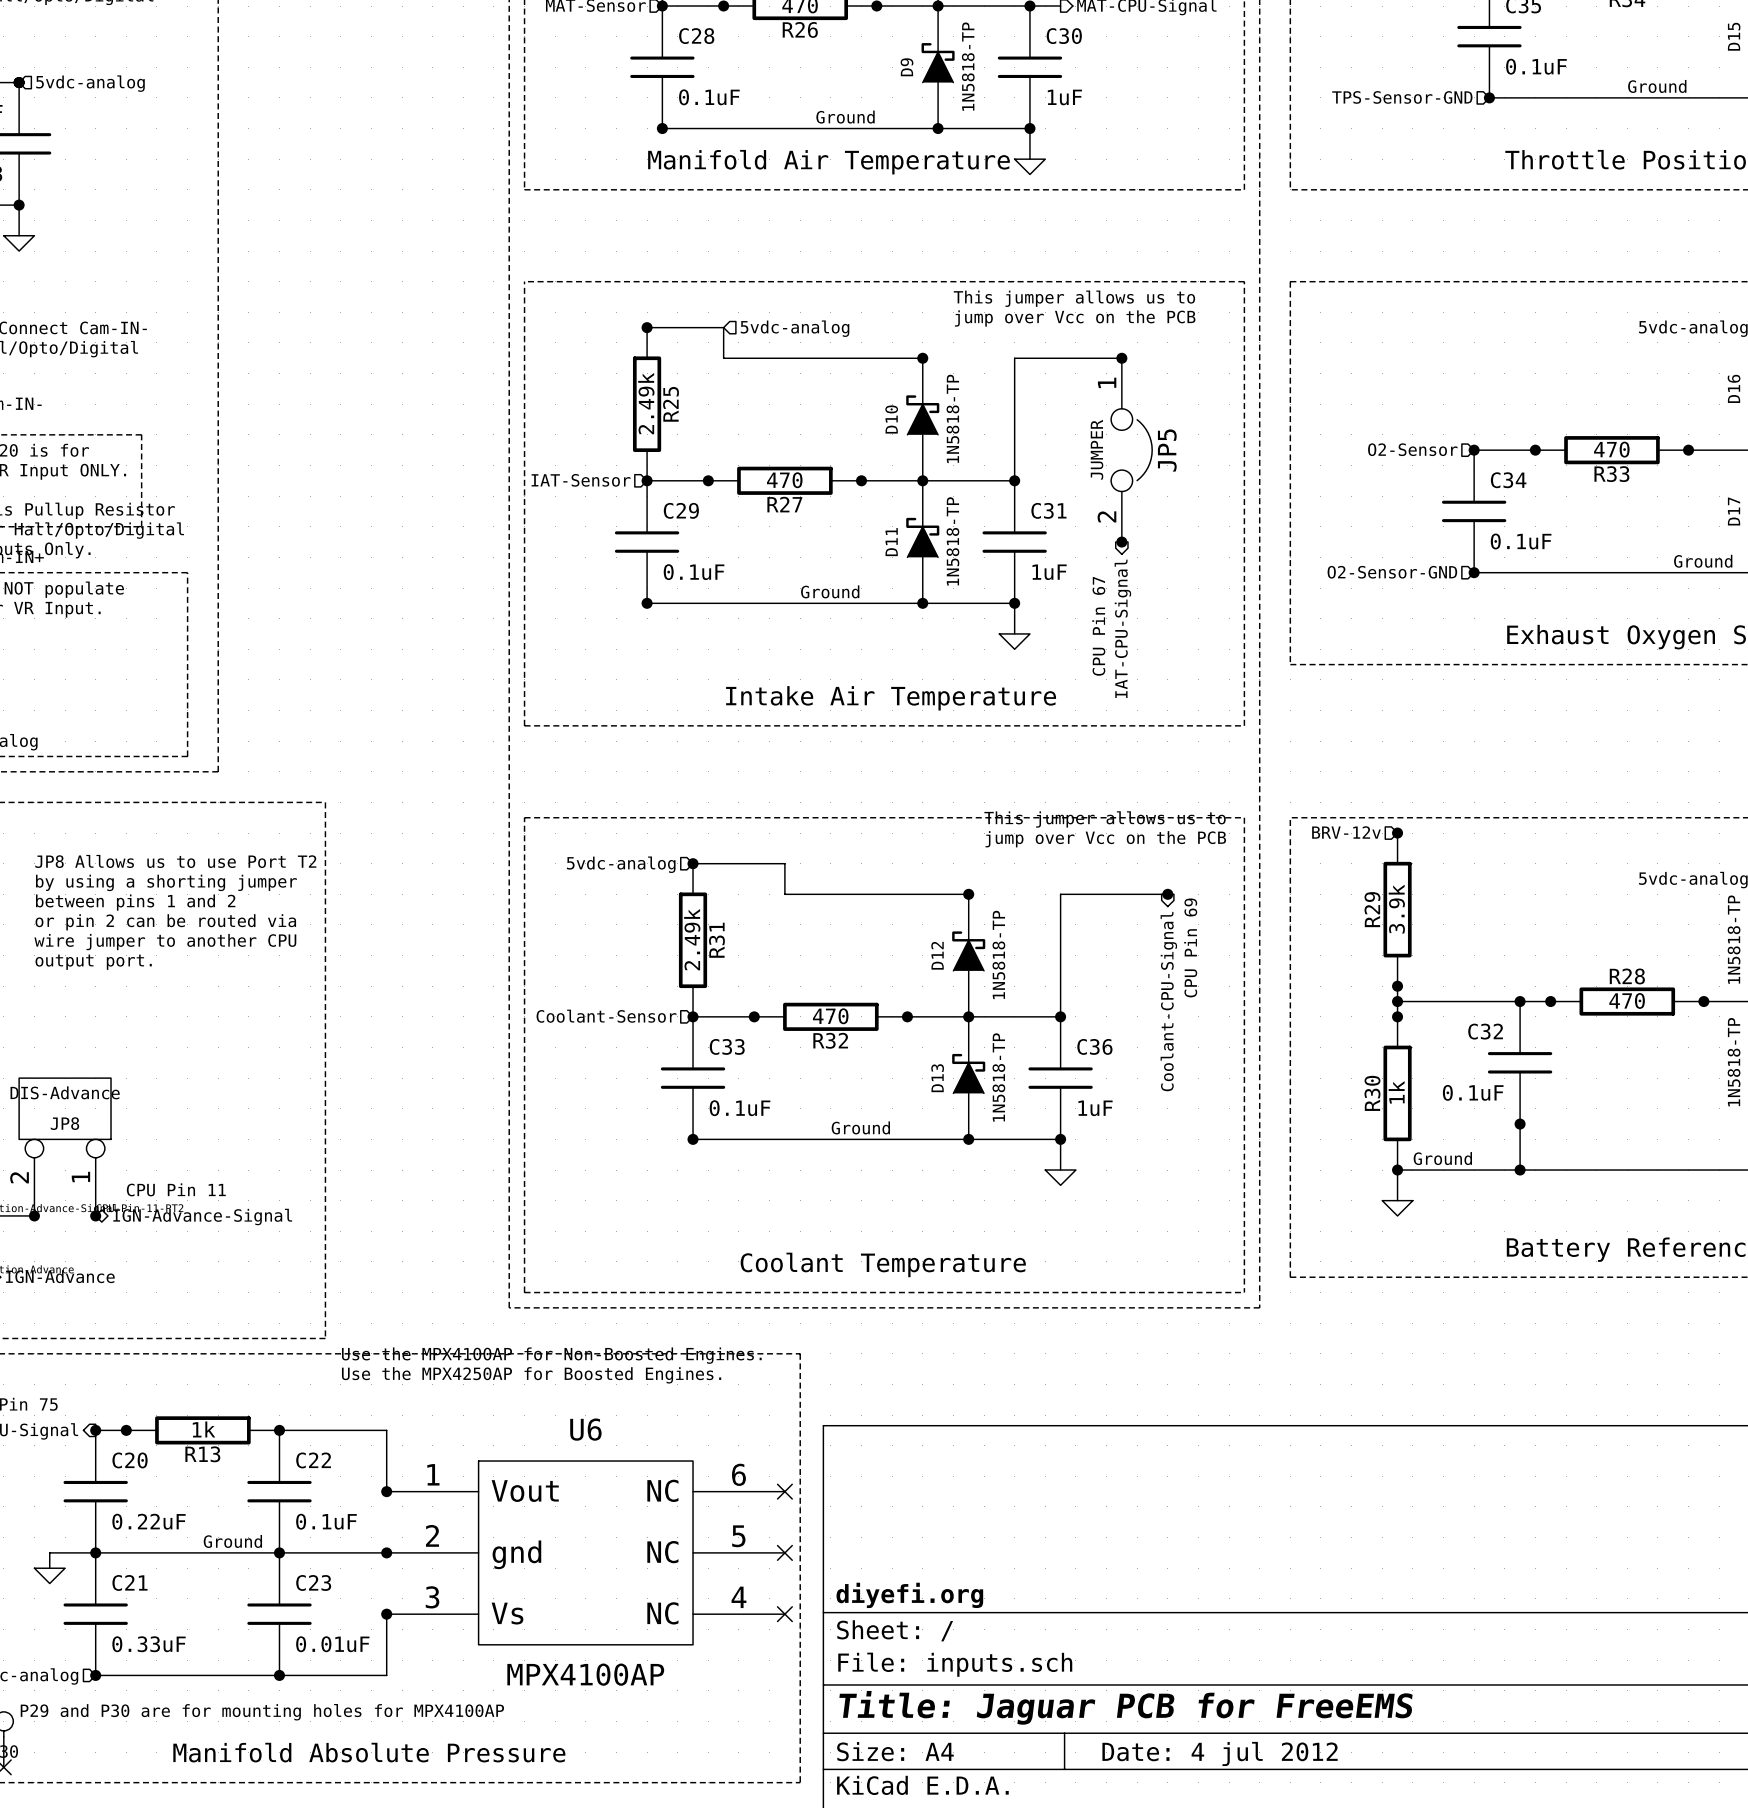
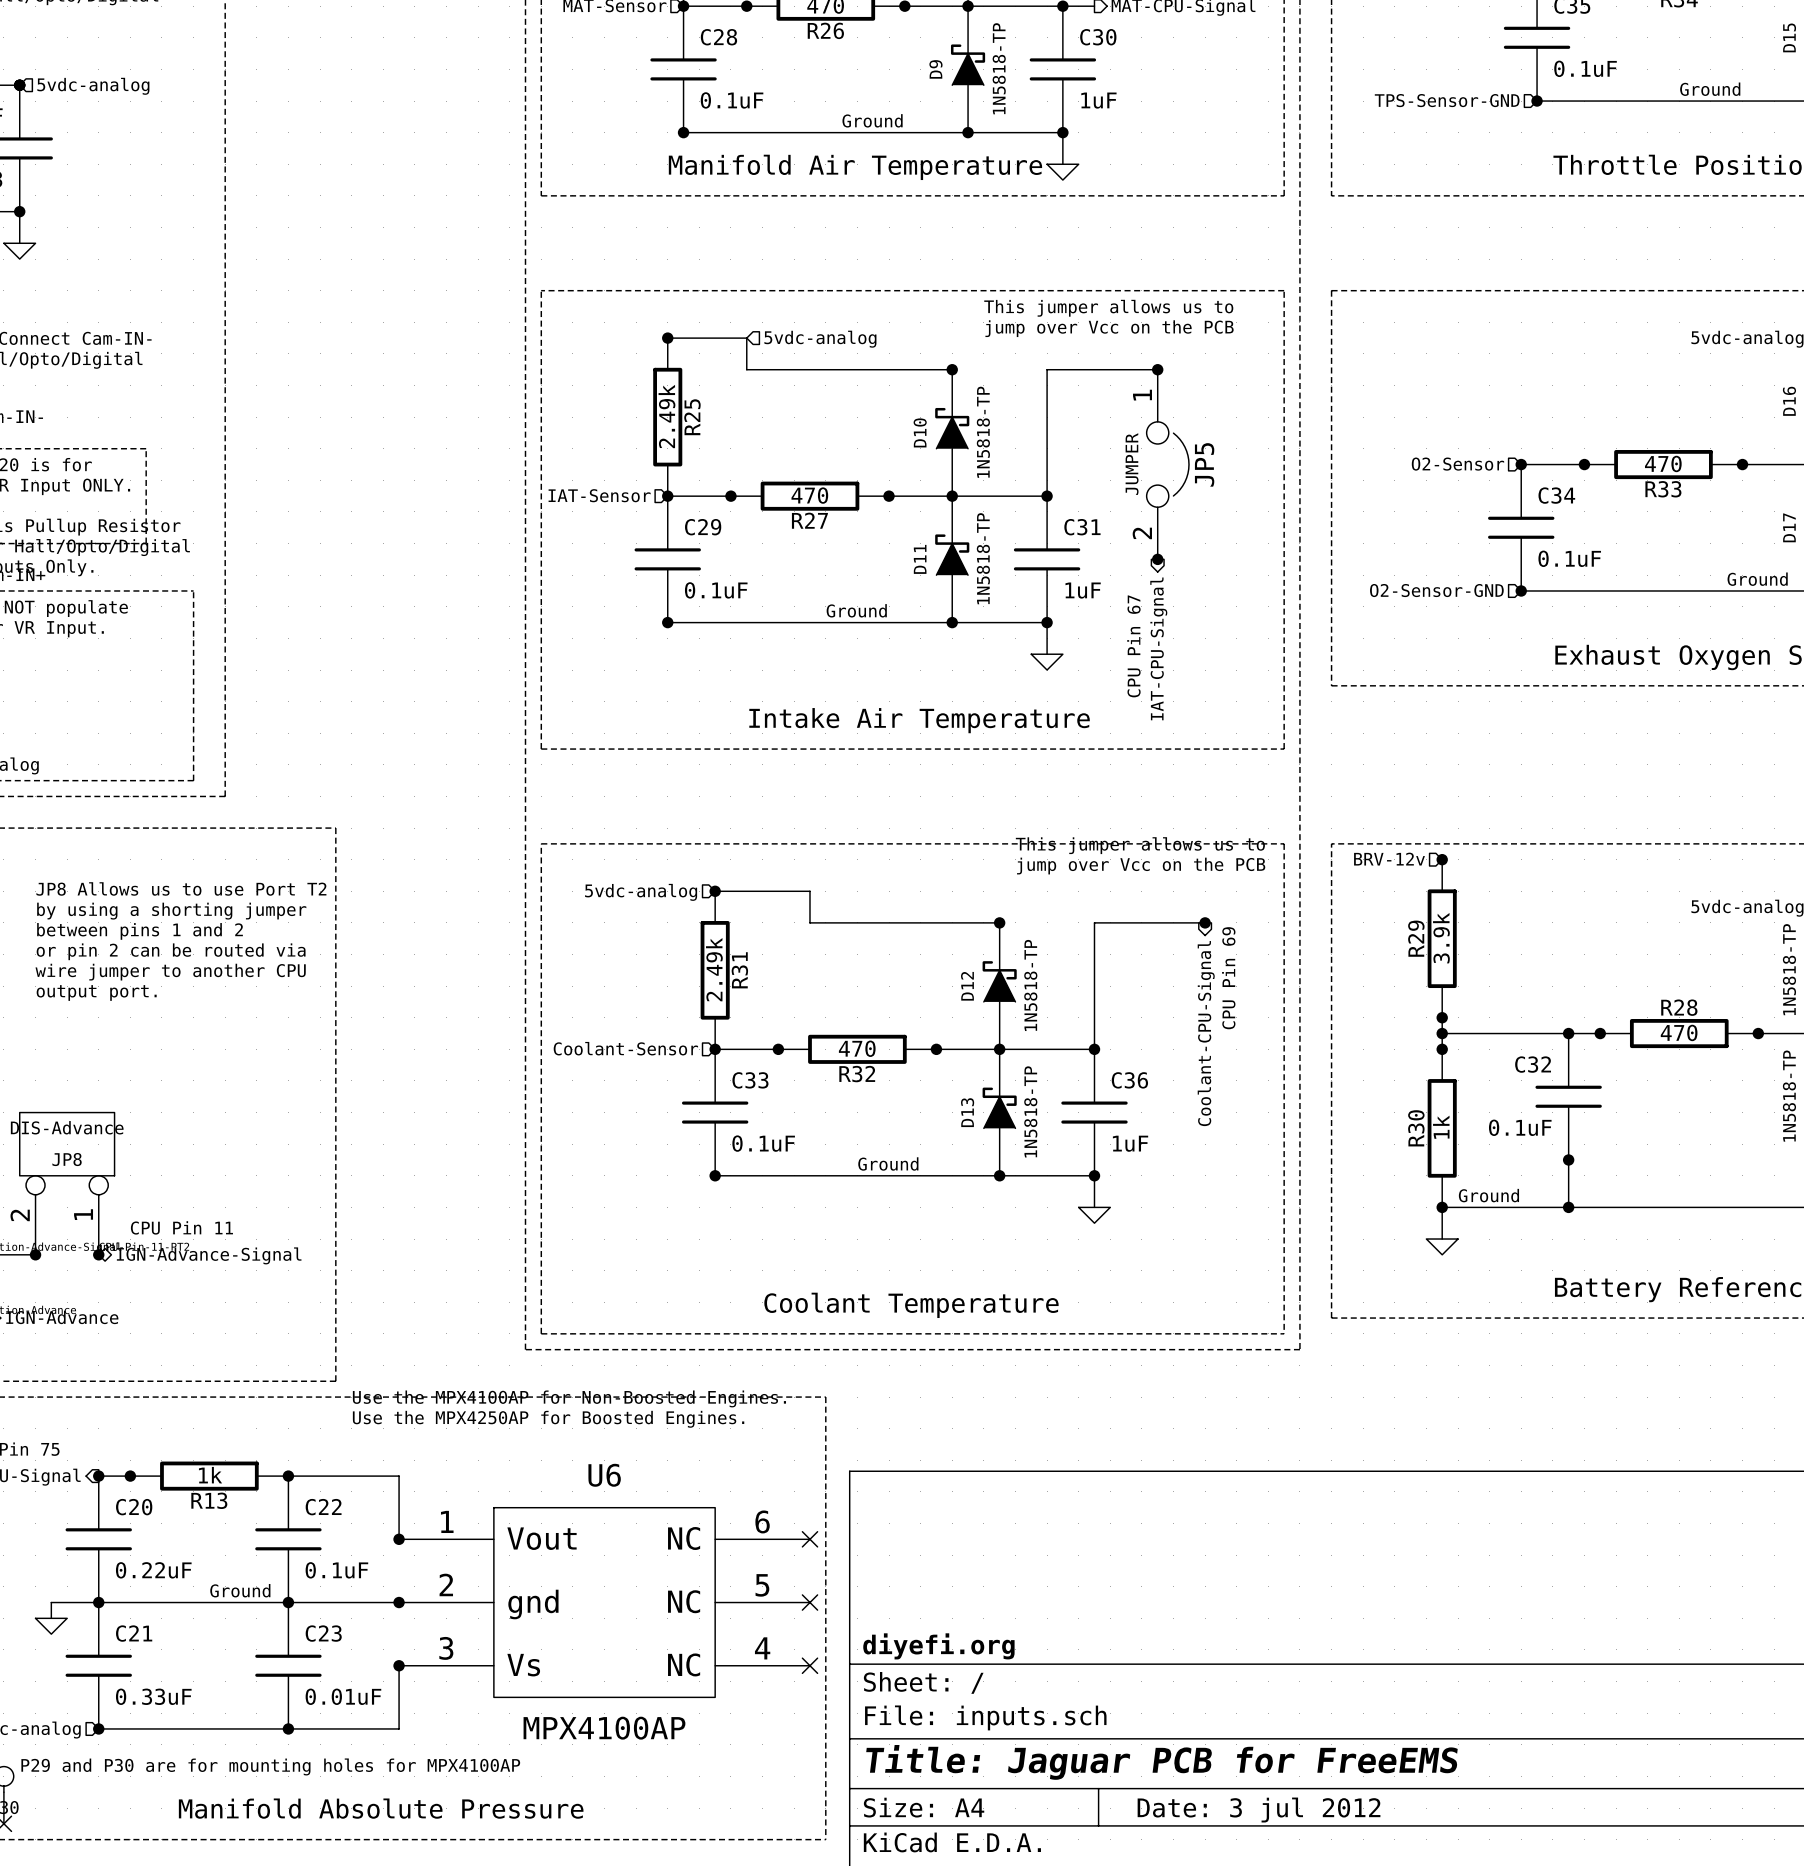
title block: Date: 4 jul 2012 (1220, 1753) -> Date: 3 jul 2012 (1259, 1810)

